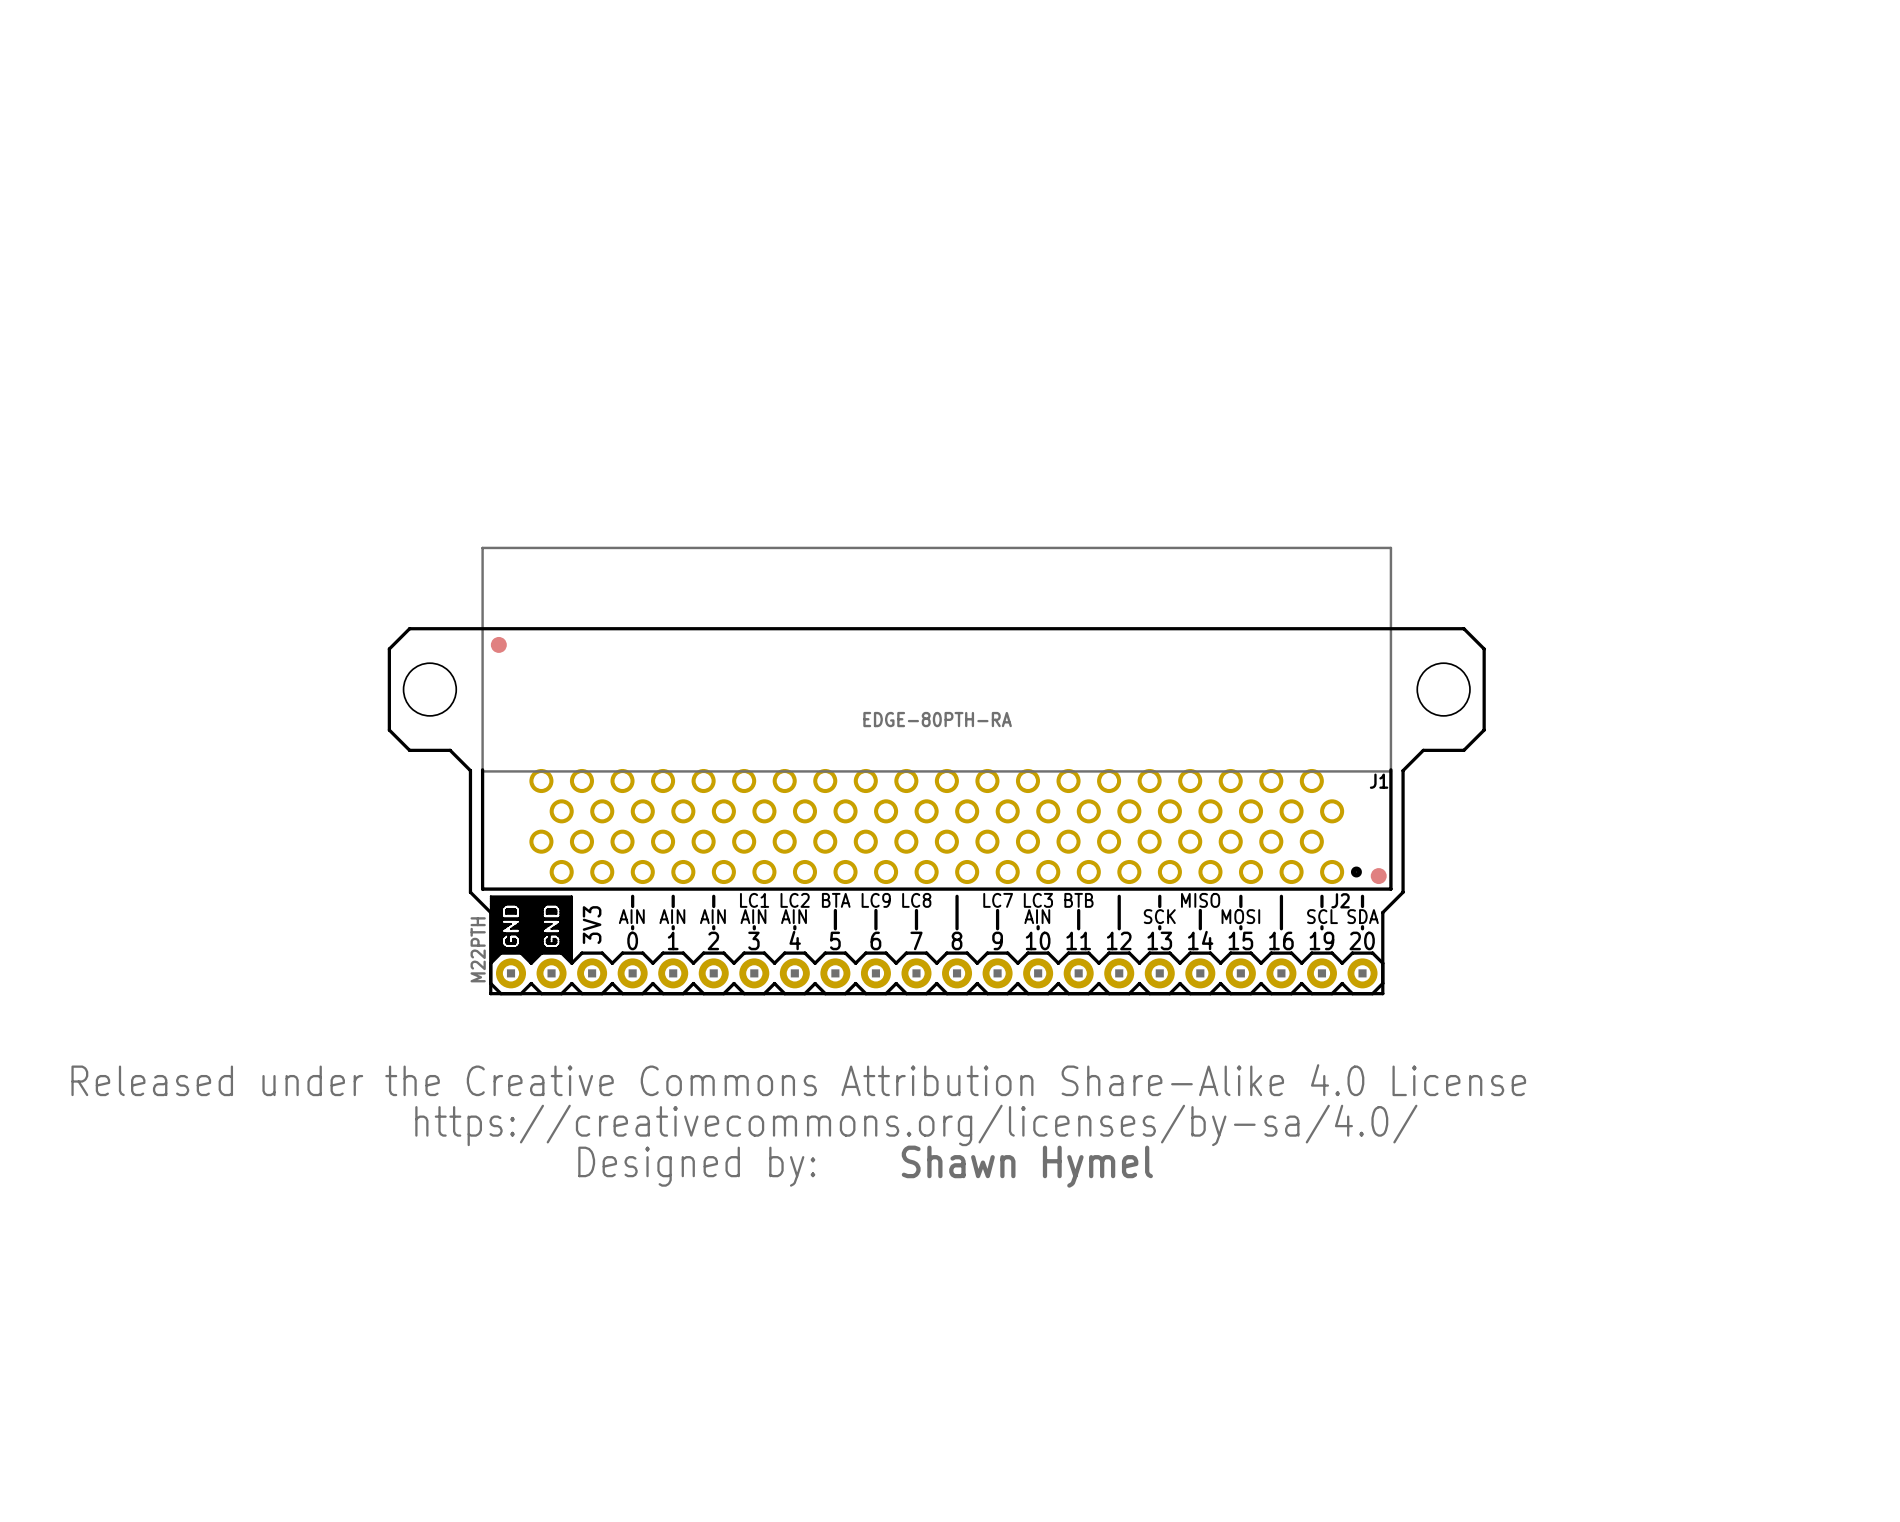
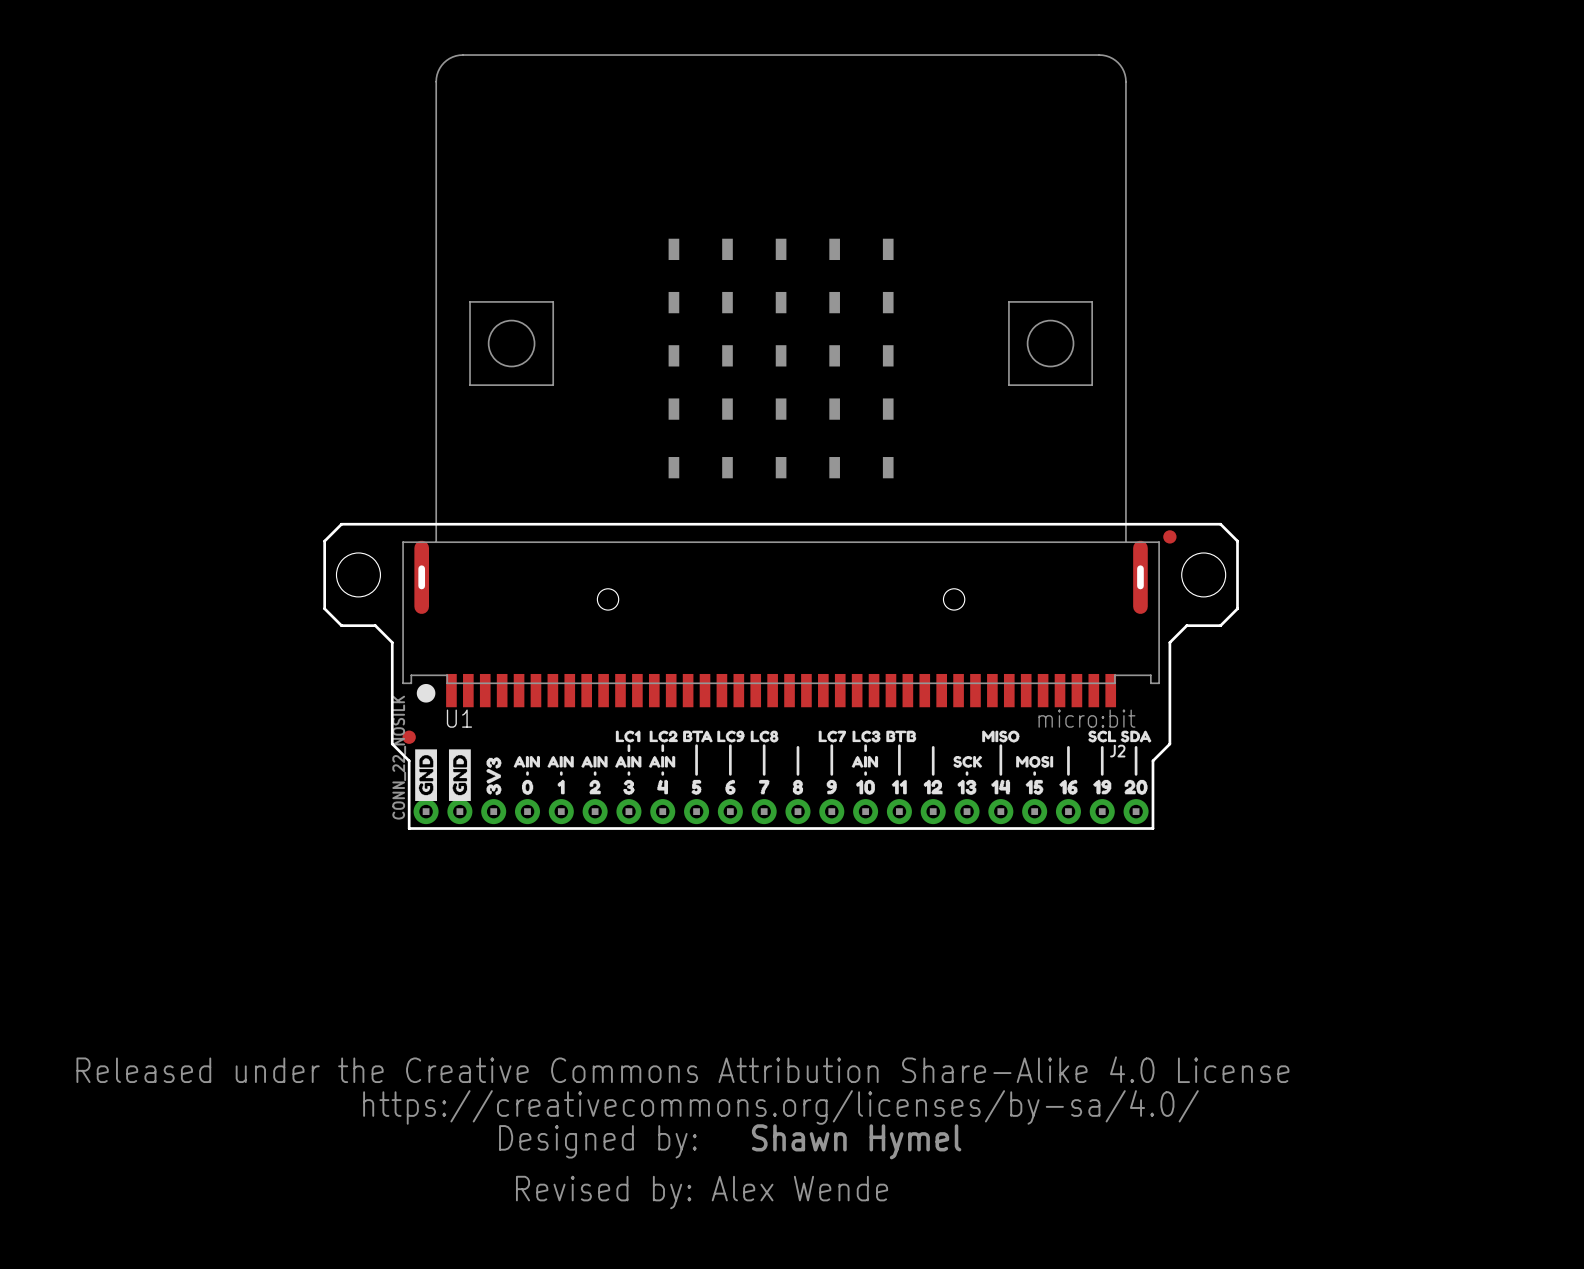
U1: none -> micro:bit (781, 380)
part position: (498, 644) -> (409, 737)
J1: EDGE-80PTH-RA (936, 718) -> none
drawing: none -> [415, 730, 779, 801]
drawing: none -> [818, 730, 917, 795]
drawing: none -> [923, 730, 1148, 795]
drawing: none -> [1088, 730, 1152, 743]
part position: (1378, 876) -> (1169, 536)
line: none -> (628, 745) (628, 750)
line: none -> (662, 745) (662, 750)
line: none -> (696, 745) (696, 759)
line: none -> (730, 745) (730, 759)
line: none -> (764, 745) (764, 759)
line: none -> (831, 745) (831, 759)
line: none -> (865, 745) (865, 750)
line: none -> (899, 745) (899, 759)
line: none -> (1000, 745) (1000, 759)
drawing: [489, 895, 573, 965] -> none
line: (632, 896) (632, 906) -> none
line: (673, 896) (673, 906) -> none
line: (713, 896) (713, 906) -> none
line: (1159, 896) (1159, 906) -> none
line: (1240, 896) (1240, 906) -> none
text: LC1 (754, 900) -> none
text: LC2 (795, 900) -> none
text: BTA (836, 900) -> none
text: LC9 (876, 900) -> none
text: LC8 (916, 900) -> none
text: LC7 (998, 900) -> none
text: LC3 (1038, 900) -> none
text: BTB (1078, 900) -> none
text: MISO (1200, 900) -> none
line: none -> (1102, 755) (1102, 772)
line: none -> (1136, 755) (1136, 772)
text: AIN (631, 916) -> none
text: AIN (672, 916) -> none
text: AIN (712, 916) -> none
text: AIN (753, 916) -> none
text: AIN (794, 916) -> none
text: AIN (1037, 916) -> none
text: SCK (1159, 916) -> none
text: MOSI (1240, 916) -> none
text: SCL (1322, 916) -> none
text: SDA (1363, 916) -> none
text: 3V3 (592, 925) -> none
drawing: none -> [691, 779, 702, 795]
drawing: none -> [725, 779, 736, 795]
drawing: none -> [759, 779, 770, 795]
drawing: none -> [792, 779, 804, 795]
drawing: none -> [826, 779, 837, 795]
drawing: none -> [891, 779, 907, 795]
text: 0 (632, 940) -> none
text: 1 (673, 940) -> none
text: 2 (713, 940) -> none
text: 3 (753, 940) -> none
text: 4 (795, 940) -> none
text: 5 (835, 940) -> none
text: 6 (875, 940) -> none
text: 7 (916, 940) -> none
text: 8 (957, 940) -> none
text: 9 (997, 940) -> none
text: 10 (1038, 940) -> none
text: 11 (1078, 940) -> none
text: 12 (1119, 940) -> none
text: 13 (1159, 940) -> none
text: 14 (1200, 940) -> none
text: 15 (1240, 940) -> none
text: 16 (1281, 940) -> none
text: 19 (1321, 940) -> none
text: 20 (1362, 940) -> none
J2 value: M22PTH (478, 949) -> CONN_22_NOSILK (399, 757)
J2 footprint: [489, 951, 1385, 996] -> [413, 799, 1149, 825]
drawing position: (798, 1125) -> (682, 1107)
text position: Shawn Hymel (1027, 1166) -> Shawn Hymel (856, 1141)
text: none -> Revised by: Alex Wende (702, 1192)

